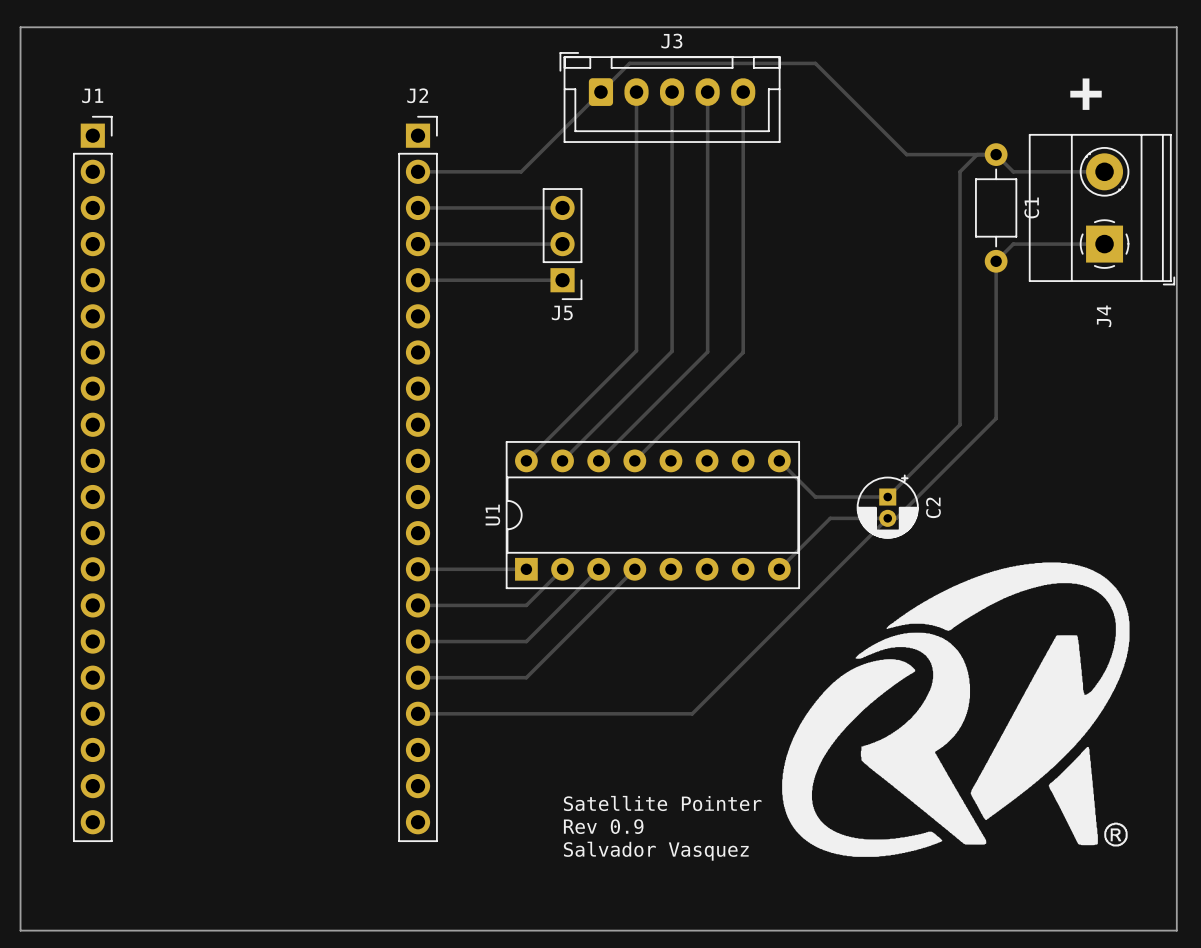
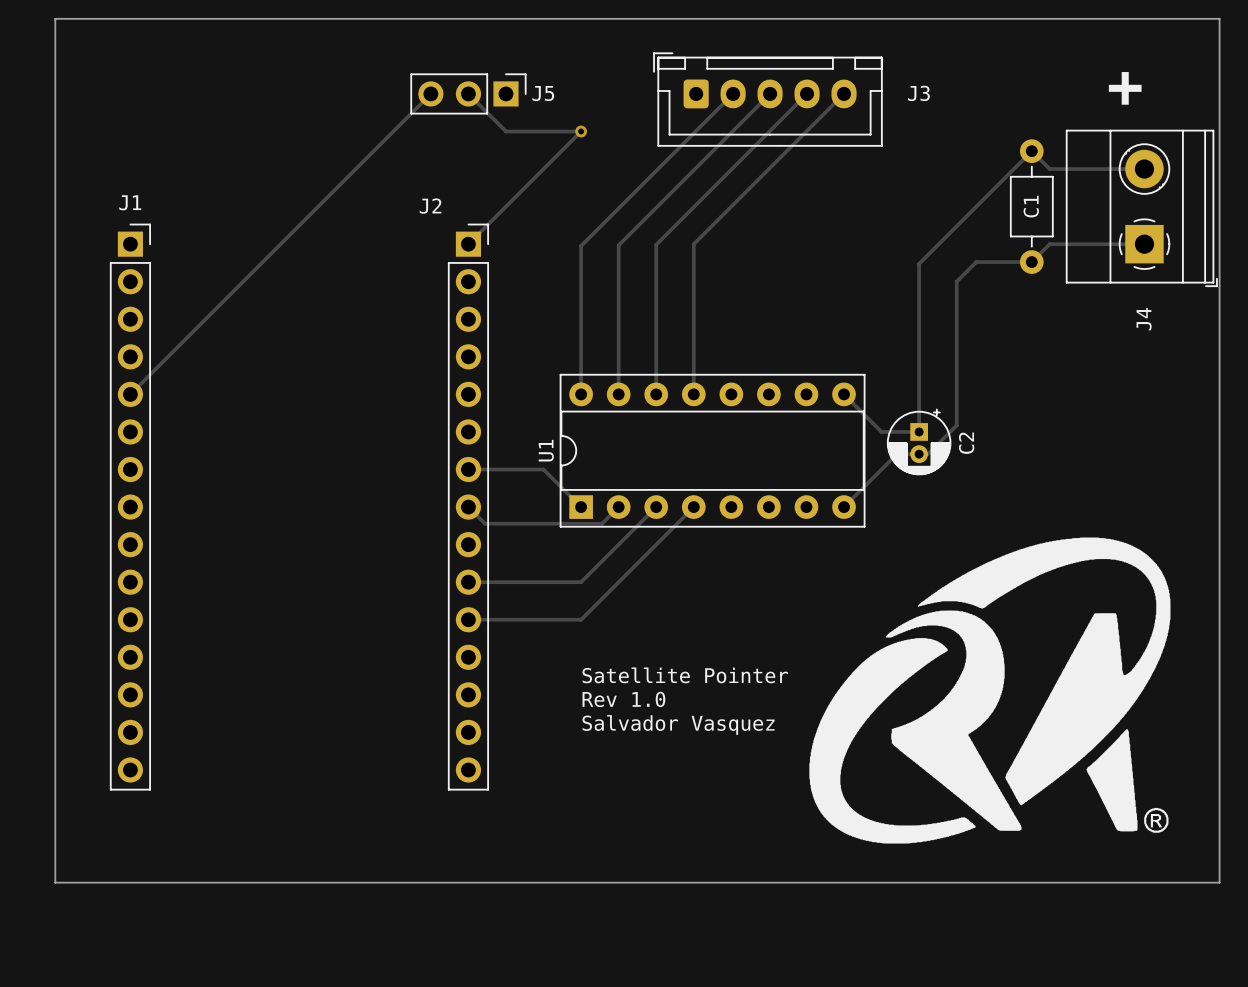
board edge: (56, 27) (20, 27) (20, 930) (1176, 930) (1176, 858) -> (55, 18) (55, 882) (1219, 882)
J3 name position: J3 (671, 41) -> J3 (918, 93)
track: (636, 92) (636, 350) (526, 460) -> none
track: (672, 92) (672, 351) (562, 460) -> none
track: (707, 92) (707, 351) (598, 460) -> none
track: (743, 92) (743, 352) (634, 460) -> none
J1 name position: J1 (92, 95) -> J1 (130, 202)
J2 name position: J2 (417, 95) -> J2 (430, 206)
J3 position: (670, 97) -> (767, 99)
track: none -> (430, 93) (130, 394)
track: none -> (468, 93) (506, 131) (581, 131) (468, 244)
track: none -> (733, 93) (581, 245) (581, 394)
track: none -> (770, 93) (618, 245) (618, 394)
track: none -> (807, 93) (656, 244) (656, 394)
track: none -> (844, 93) (693, 244) (693, 394)
J1 footprint: [73, 115, 113, 842] -> [109, 223, 151, 791]
J2 footprint: [398, 115, 438, 842] -> [447, 223, 489, 791]
via: none -> (581, 131)
track: (977, 154) (960, 171) (960, 424) (887, 497) (815, 497) (779, 460) -> none
track: (996, 154) (906, 154) (815, 63) (629, 63) (521, 171) (418, 171) -> (1031, 151) (919, 263) (919, 431) (881, 431) (844, 394)
track: (418, 207) (562, 207) -> none
C1 name position: C1 (1031, 207) -> C1 (1031, 206)
track: (418, 244) (562, 244) -> none
J5 rotation: 0° (562, 244) -> 90° counterclockwise (468, 93)
J5 position: (562, 244) -> (468, 93)
track: (996, 261) (996, 418) (896, 518) (830, 518) (779, 569) -> (1031, 262) (976, 262) (956, 281) (956, 425) (928, 454) (896, 454) (844, 507)
track: (418, 280) (562, 280) -> none
track: none -> (468, 469) (543, 469) (581, 507)
track: none -> (468, 507) (485, 523) (602, 523) (618, 507)
track: none -> (656, 507) (581, 582) (543, 582)
track: none -> (693, 507) (618, 582)
C2 position: (887, 506) -> (919, 441)
U1 position: (652, 515) -> (712, 450)
track: (887, 518) (692, 713) (418, 713) -> none
track: (418, 569) (454, 569) -> none
track: (562, 569) (526, 605) -> (581, 619) (543, 619)
track: (634, 569) (526, 677) (418, 677) -> none
track: (418, 605) (454, 605) -> none
track: (562, 605) (526, 641) (418, 641) -> none
text: none -> Rev 1.0 (623, 699)
drawing position: (955, 709) -> (989, 690)
text position: Satellite Pointer (662, 803) -> Satellite Pointer (685, 675)
text: Rev 0.9 (603, 826) -> none
text position: Salvador Vasquez (656, 851) -> Salvador Vasquez (678, 724)

